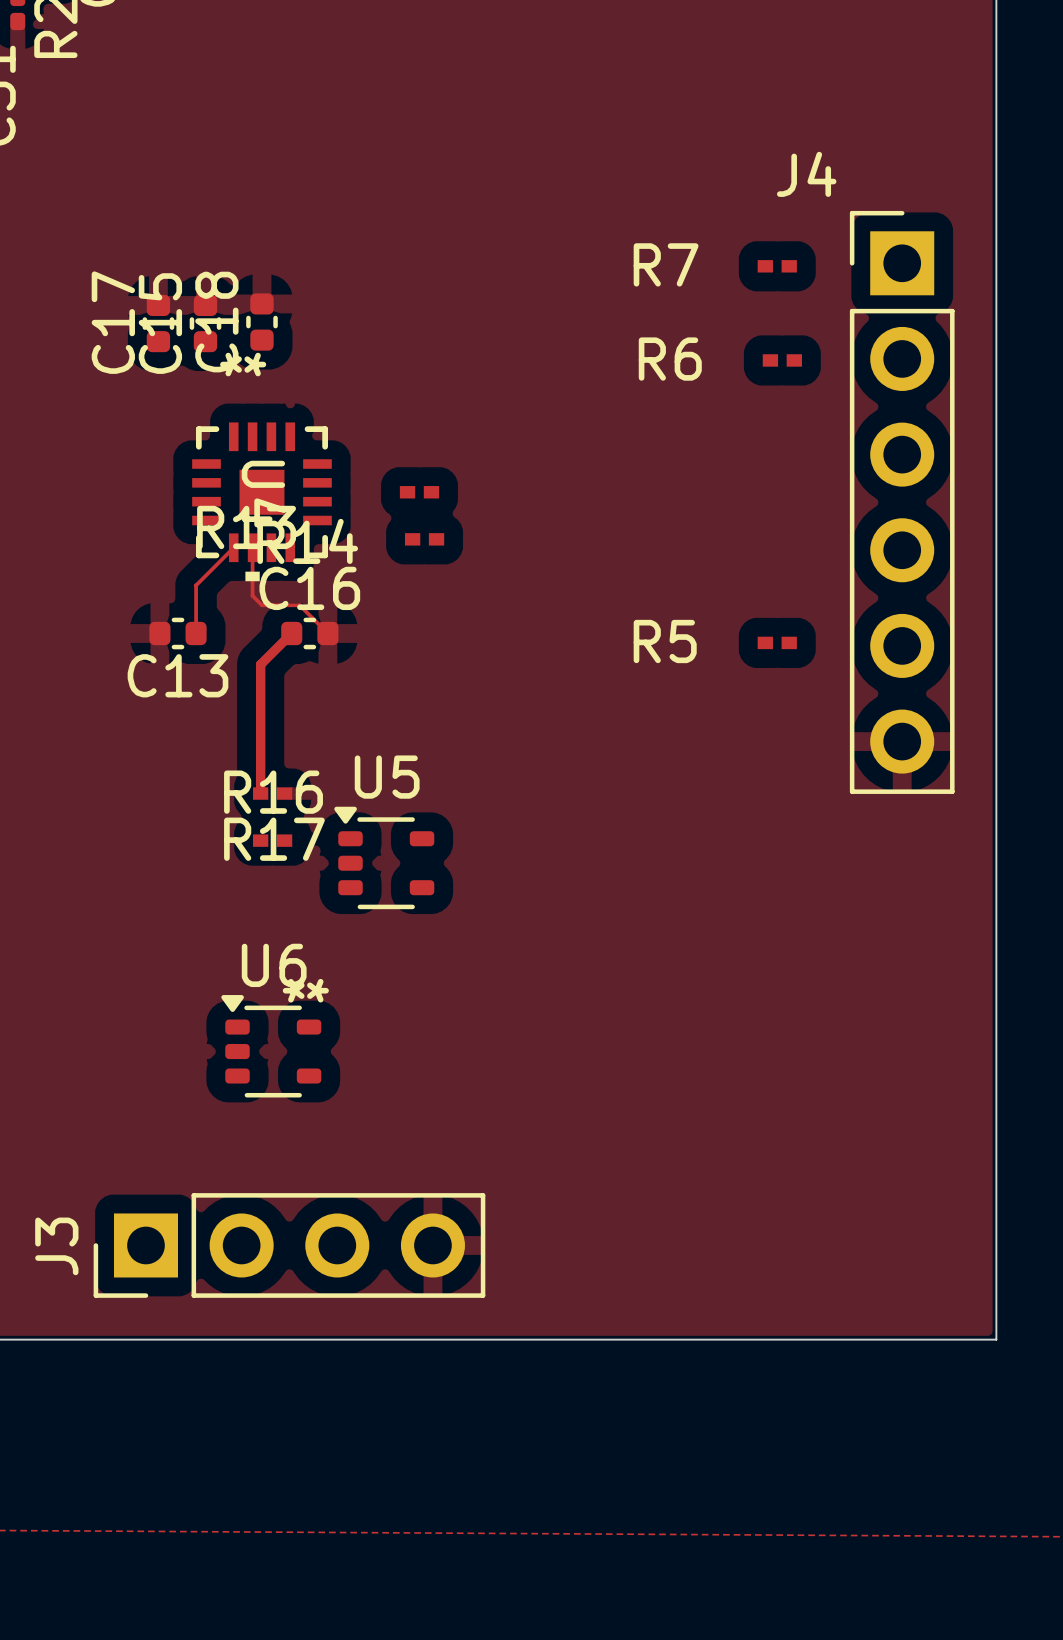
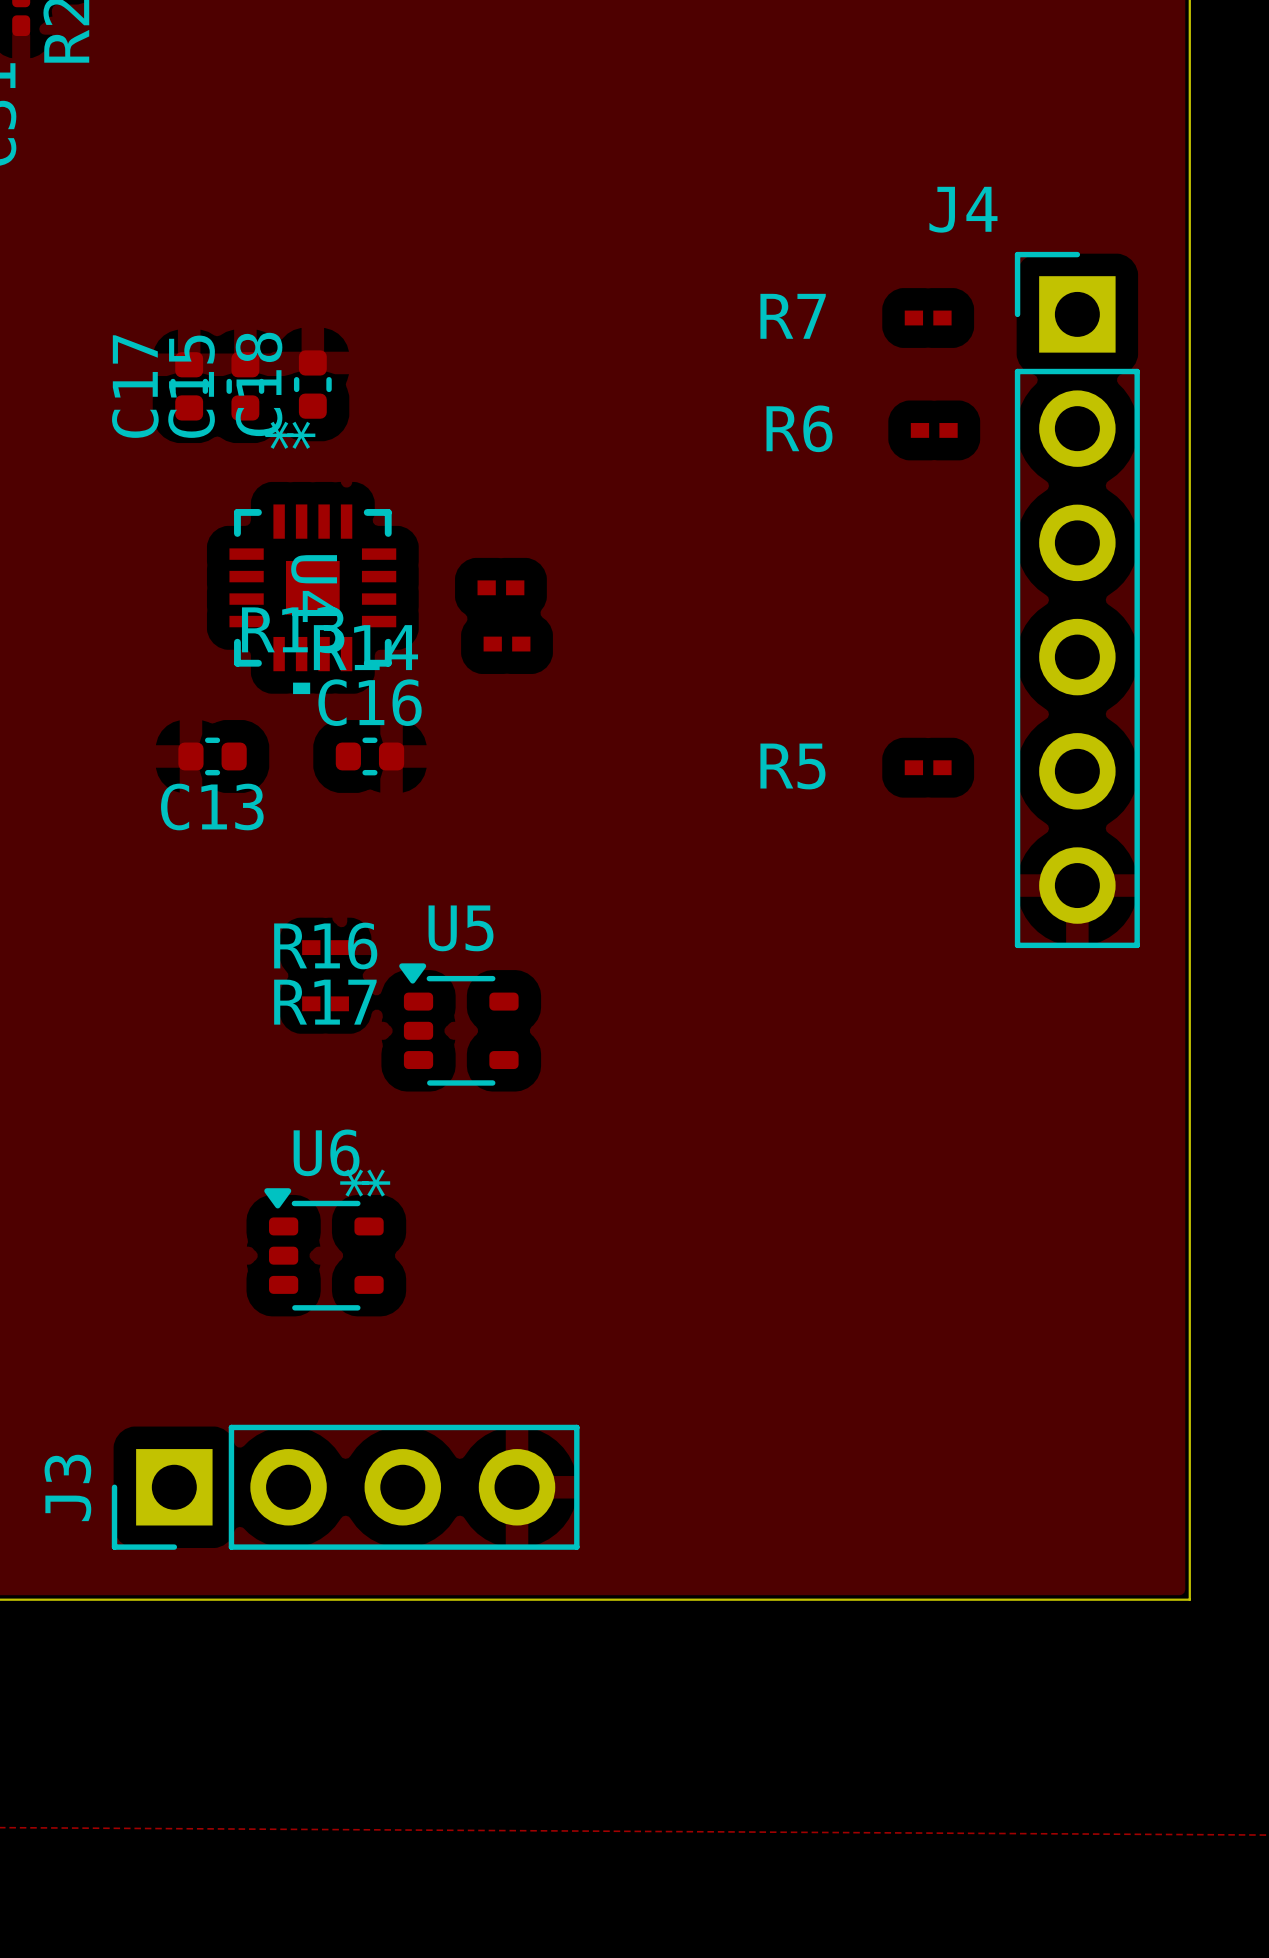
track: (233, 547) (196, 585) (196, 633) -> none
track: (252, 547) (252, 595) (261, 605) (299, 605) (327, 633) -> none
track: (291, 633) (260, 664) (260, 793) -> none

